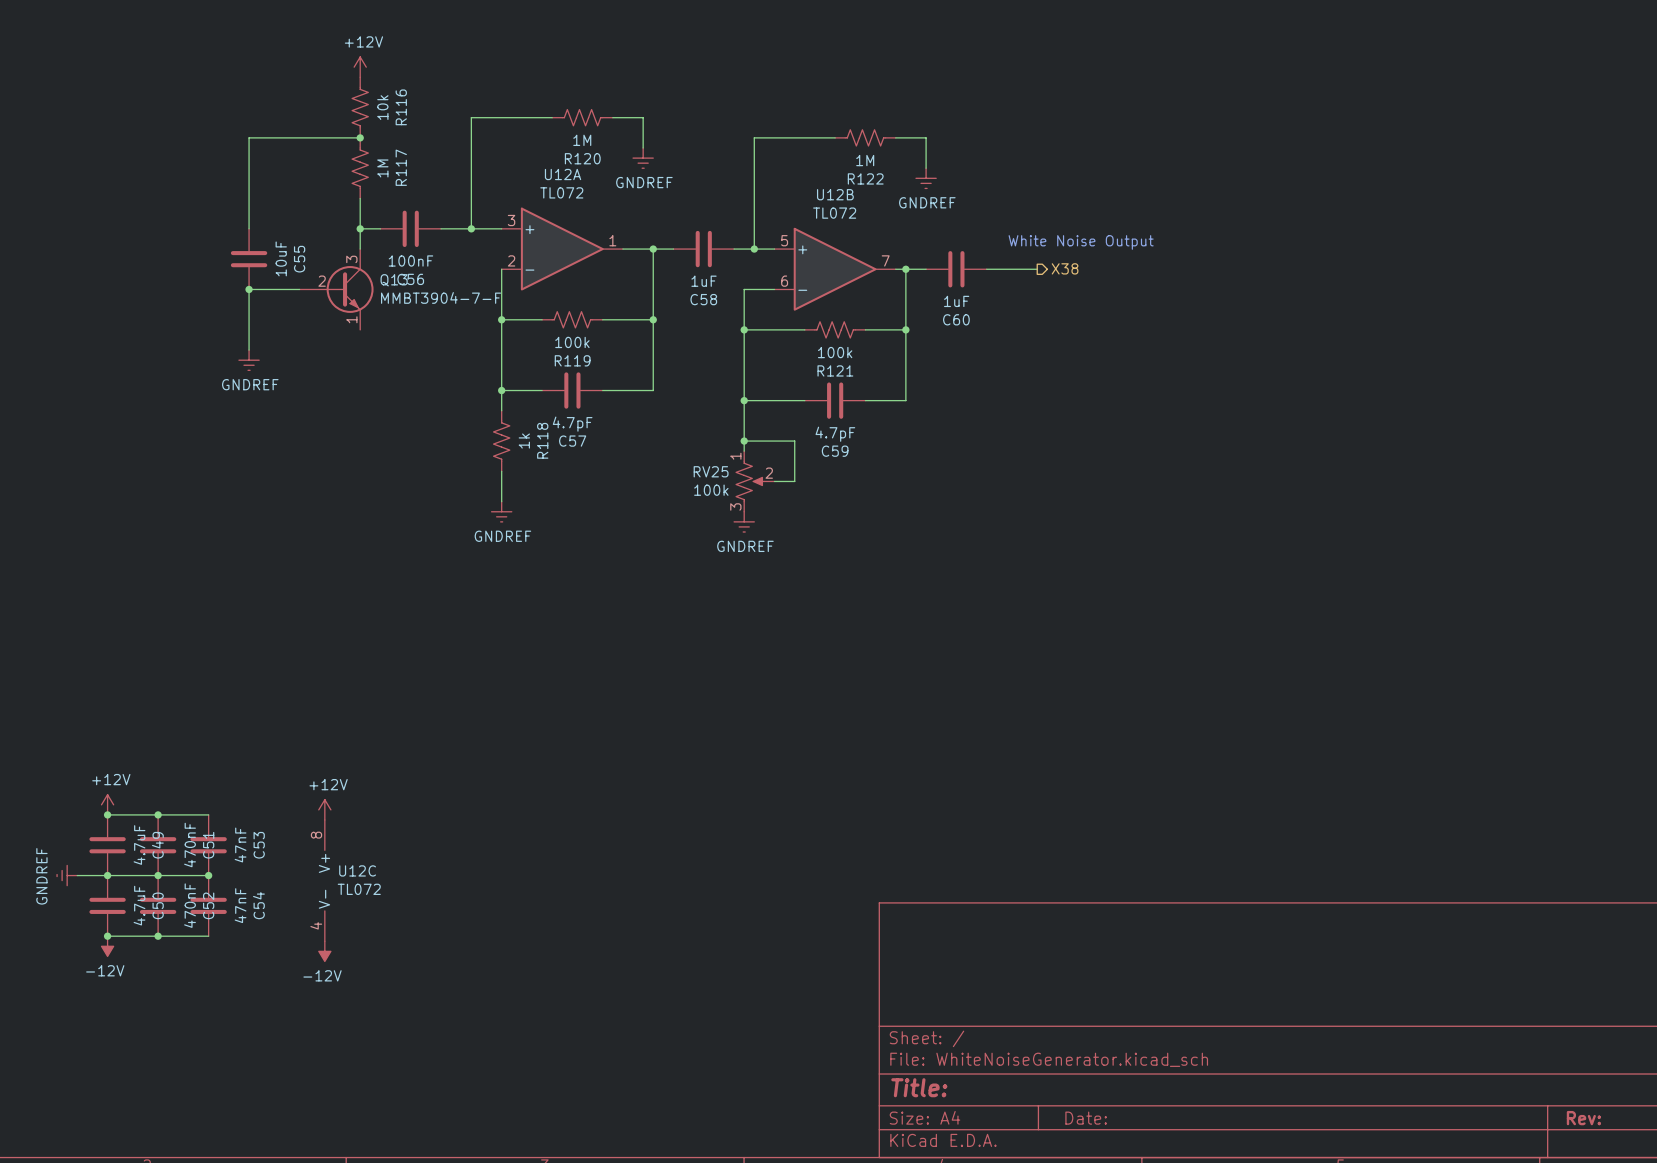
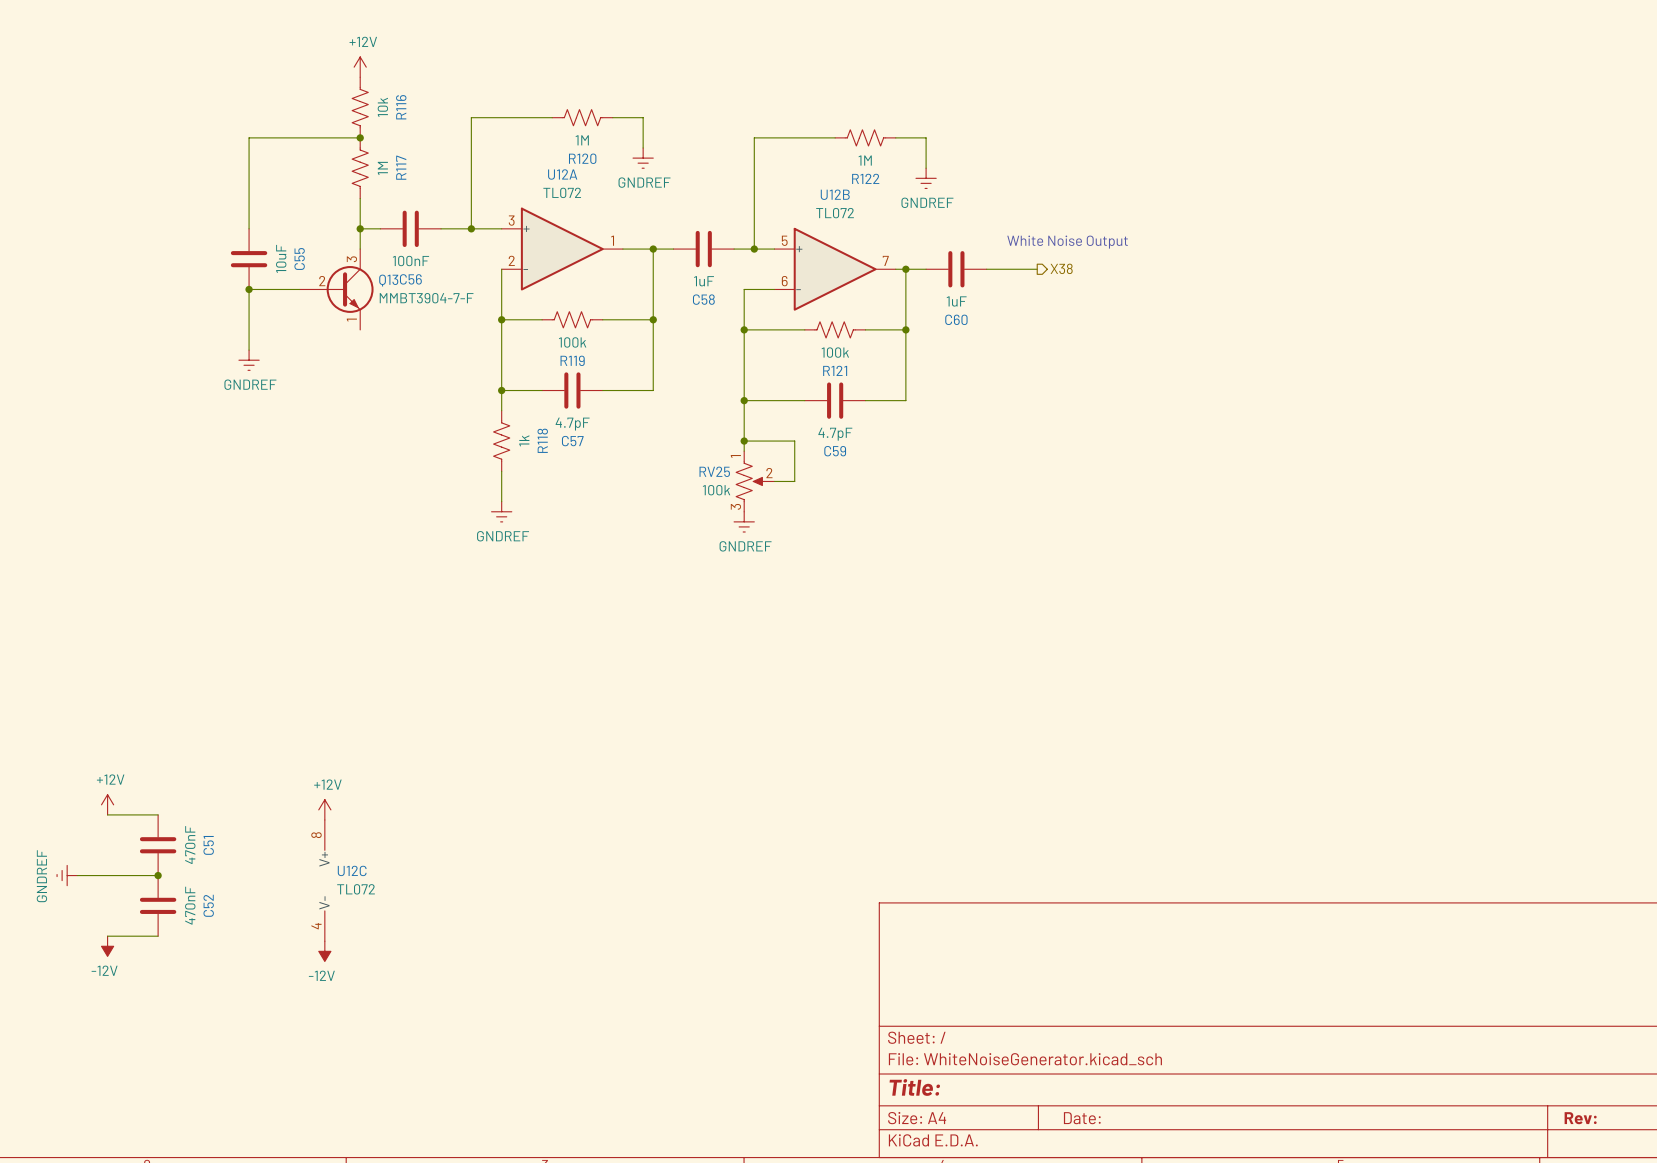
junction: (107, 814) -> none
wire: (158, 814) (208, 814) -> none
junction: (158, 814) -> none
C49: 4.7uF (107, 845) -> none
C53: 47nF (208, 845) -> none
junction: (107, 875) -> none
wire: (158, 875) (208, 875) -> none
junction: (208, 875) -> none
C50: 4.7uF (107, 905) -> none
C54: 47nF (208, 905) -> none
junction: (107, 936) -> none
wire: (158, 936) (208, 936) -> none
junction: (158, 936) -> none

